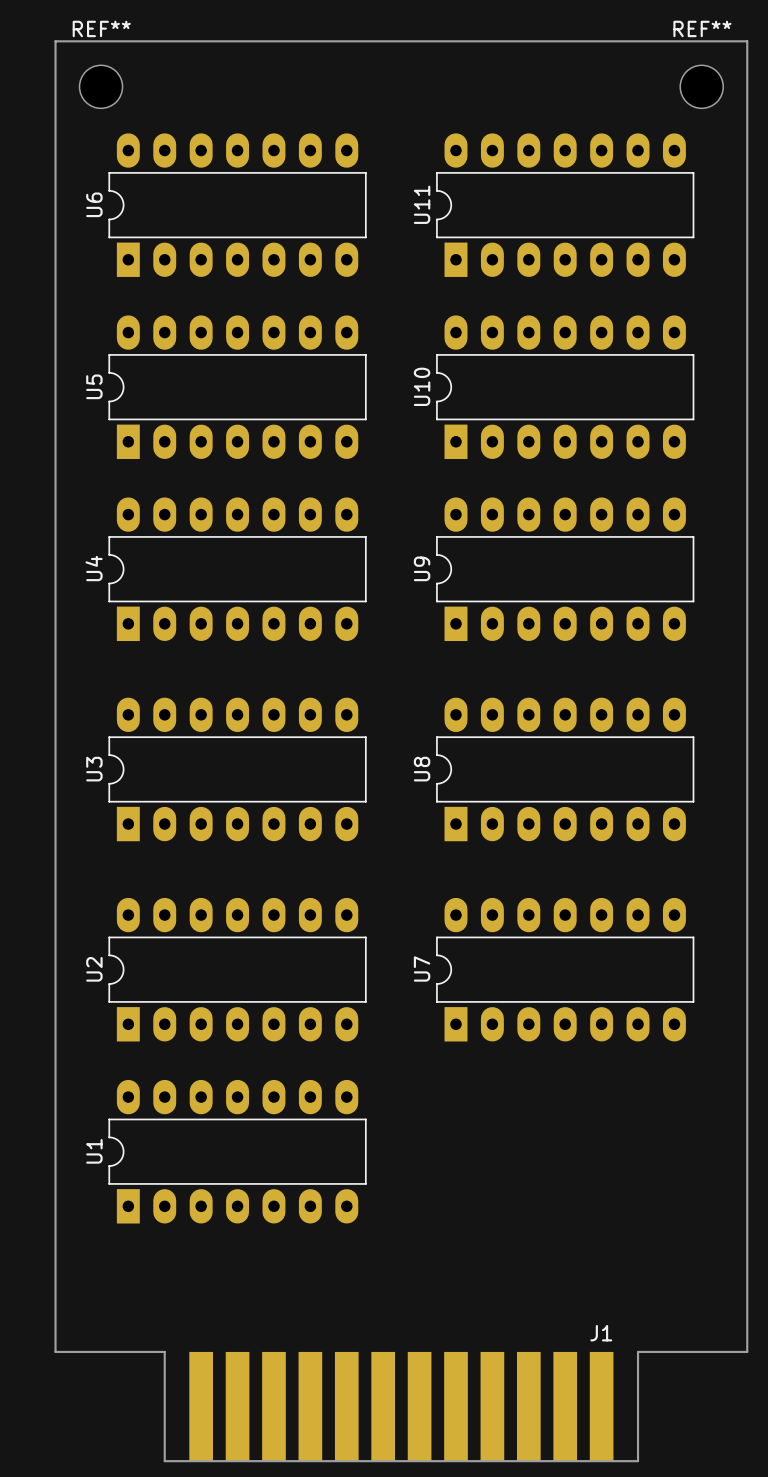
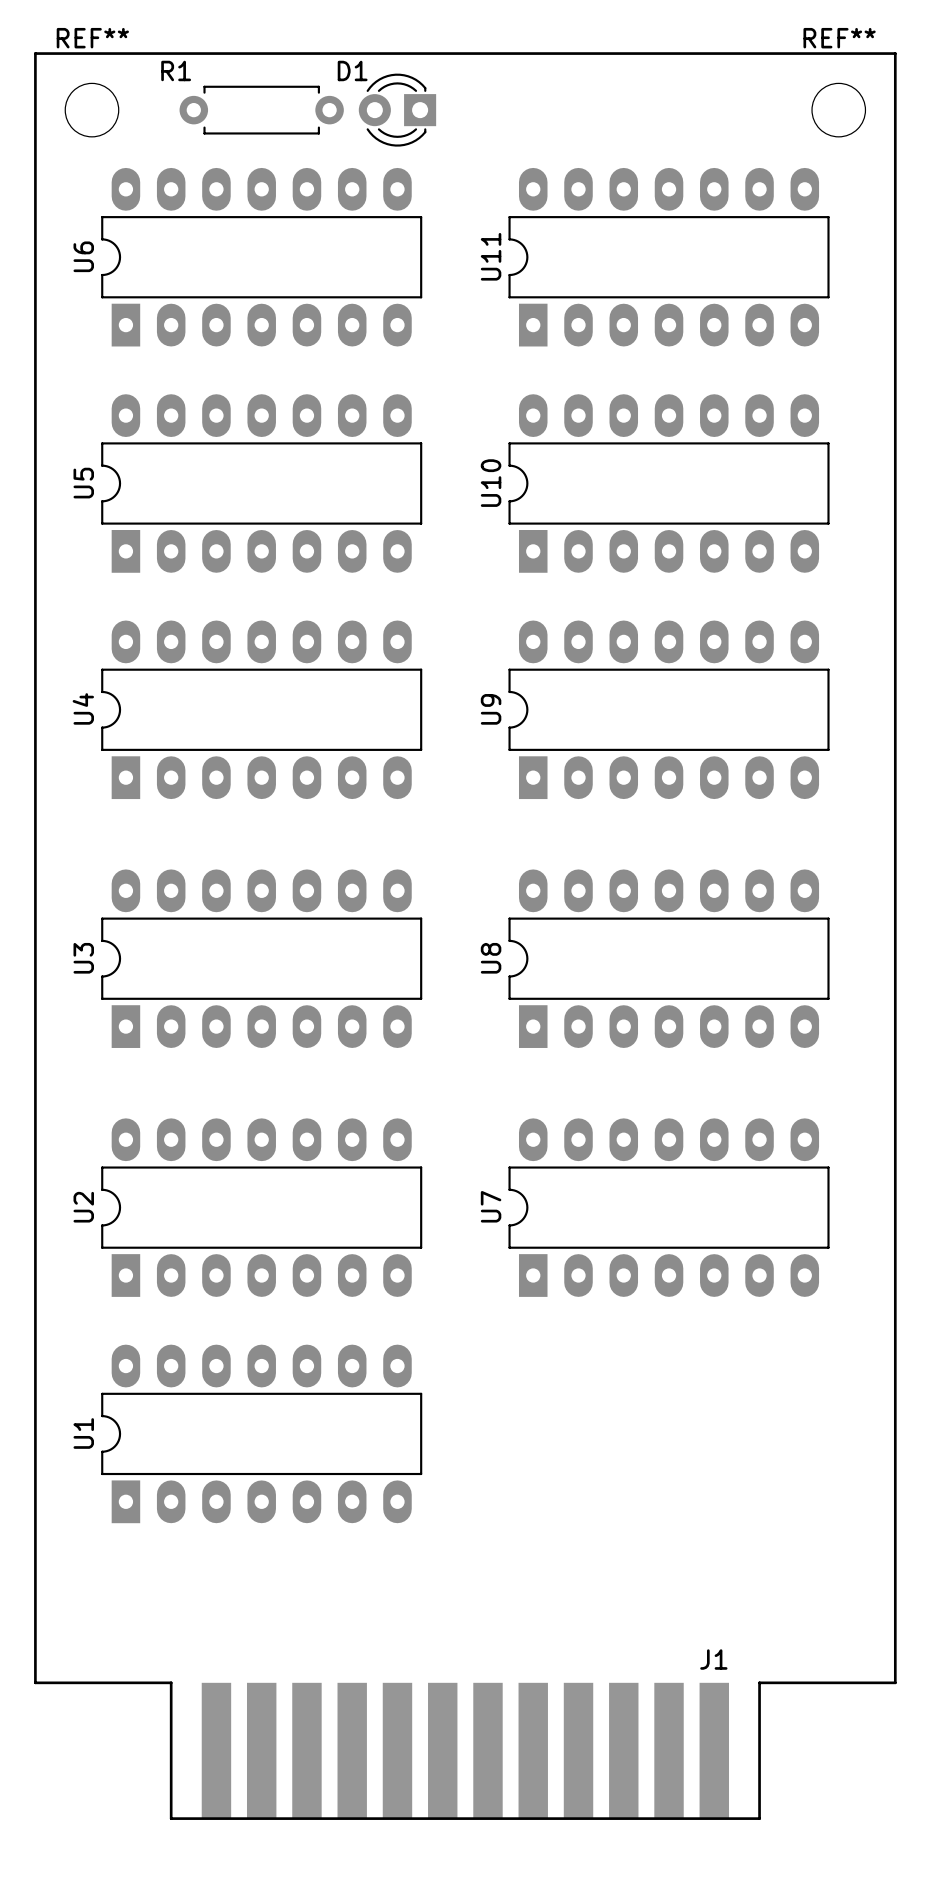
R1: none -> (261, 110)
D1: none -> (397, 110)

